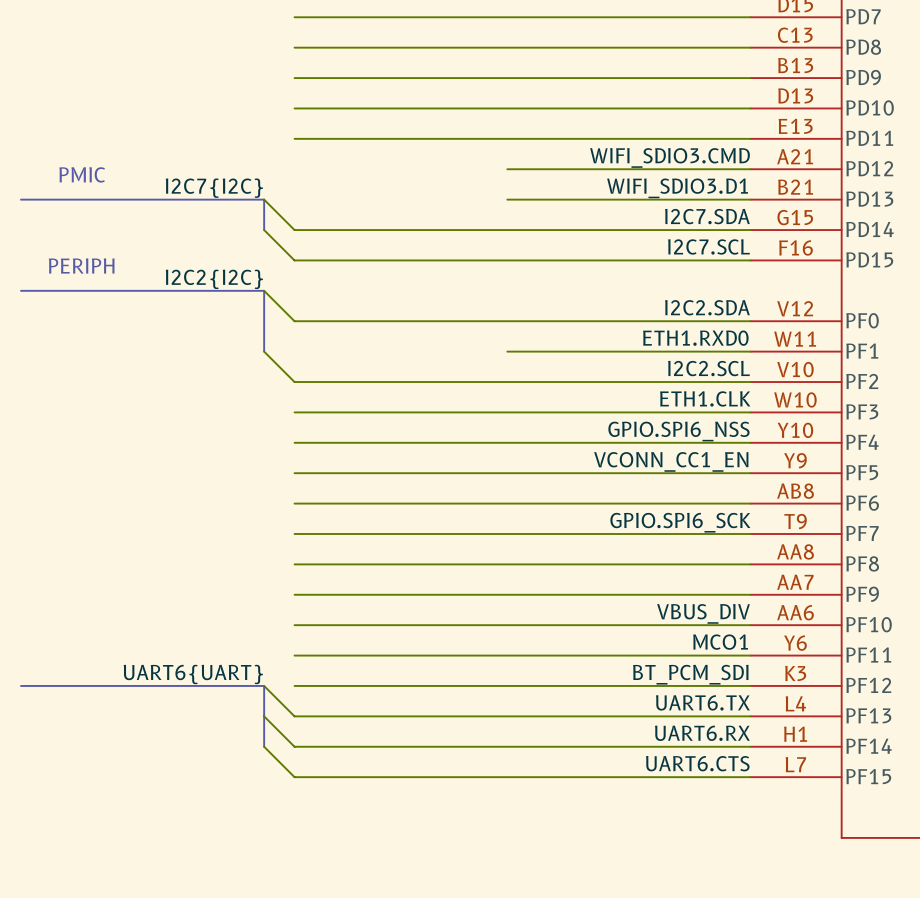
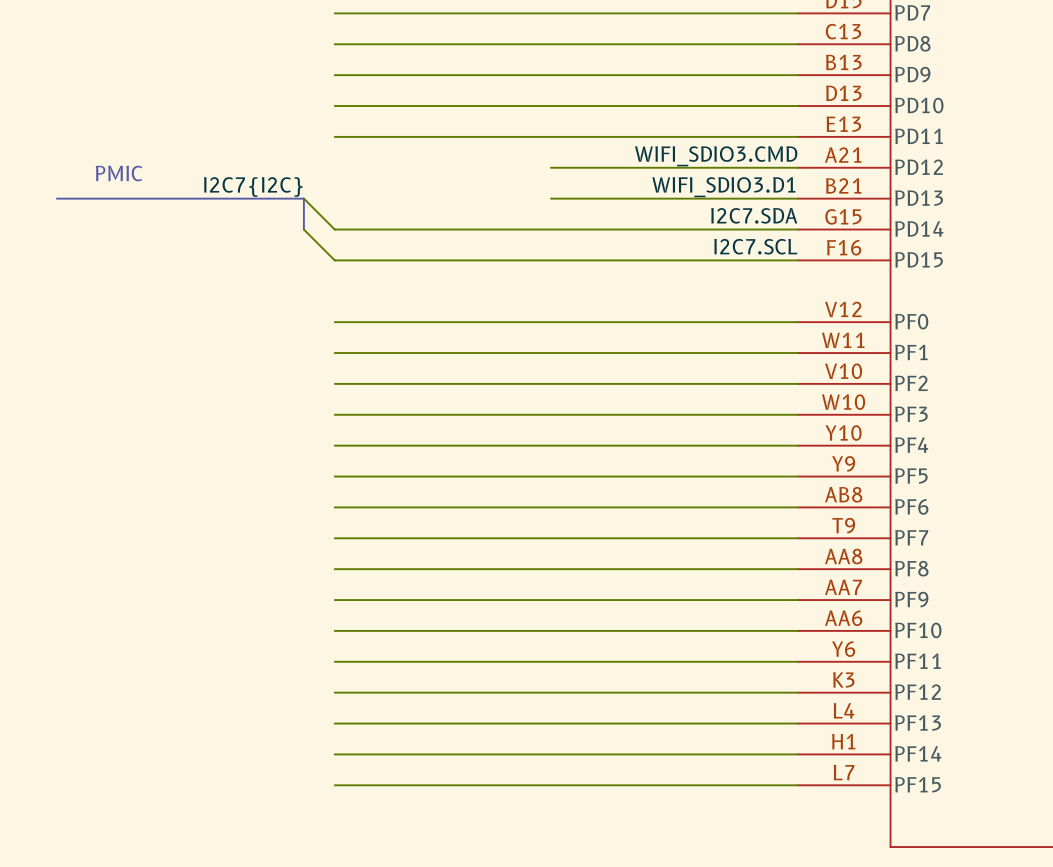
text: PERIPH (81, 265) -> none
label: I2C2{I2C} (214, 279) -> none
bus: (20, 290) (264, 290) (264, 351) -> none
wire: (264, 290) (294, 321) -> none
label: I2C2.SDA (707, 307) -> none
label: ETH1.RXD0 (695, 338) -> none
wire: (264, 351) (294, 382) -> none
wire: none -> (334, 353) (550, 353)
label: I2C2.SCL (708, 368) -> none
label: ETH1.CLK (705, 398) -> none
label: GPIO.SPI6_NSS (678, 431) -> none
label: VCONN_CC1_EN (671, 461) -> none
label: GPIO.SPI6_SCK (680, 522) -> none
label: VBUS_DIV (703, 613) -> none
label: MCO1 (720, 642) -> none
label: UART6{UART} (193, 674) -> none
label: BT_PCM_SDI (690, 674) -> none
bus: (20, 685) (264, 685) (264, 746) -> none
wire: (264, 685) (294, 716) -> none
label: UART6.TX (702, 702) -> none
wire: (264, 716) (294, 746) -> none
label: UART6.RX (702, 733) -> none
wire: (264, 746) (294, 777) -> none
label: UART6.CTS (697, 763) -> none

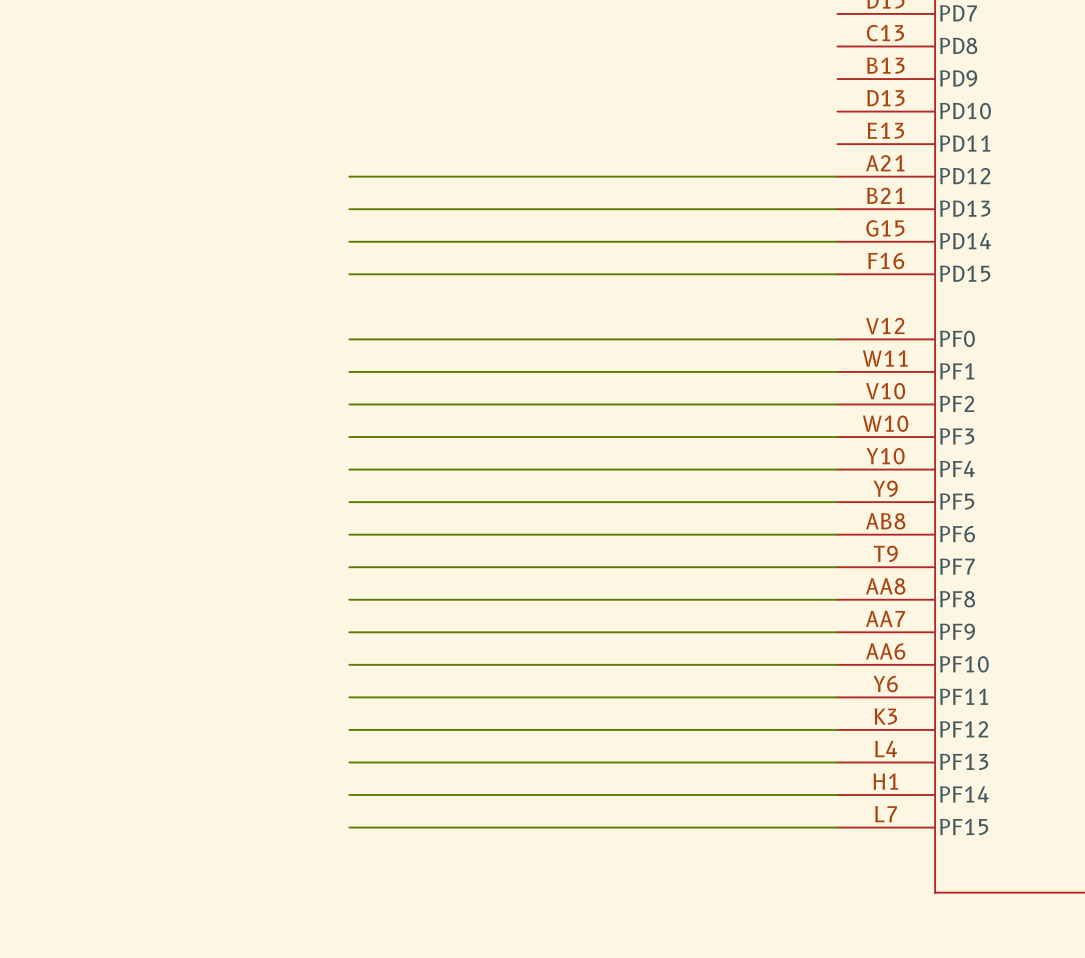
wire: (334, 13) (797, 13) -> none
wire: (334, 44) (797, 44) -> none
wire: (334, 75) (797, 75) -> none
wire: (334, 106) (797, 106) -> none
wire: (334, 136) (797, 136) -> none
label: WIFI_SDIO3.CMD (716, 156) -> none
wire: none -> (349, 176) (577, 176)
text: PMIC (119, 173) -> none
label: I2C7{I2C} (253, 187) -> none
label: WIFI_SDIO3.D1 (723, 187) -> none
bus: (56, 198) (303, 198) (303, 229) -> none
wire: (303, 198) (334, 229) -> none
wire: none -> (349, 209) (577, 209)
label: I2C7.SDA (754, 215) -> none
wire: (303, 229) (334, 260) -> none
label: I2C7.SCL (755, 246) -> none

